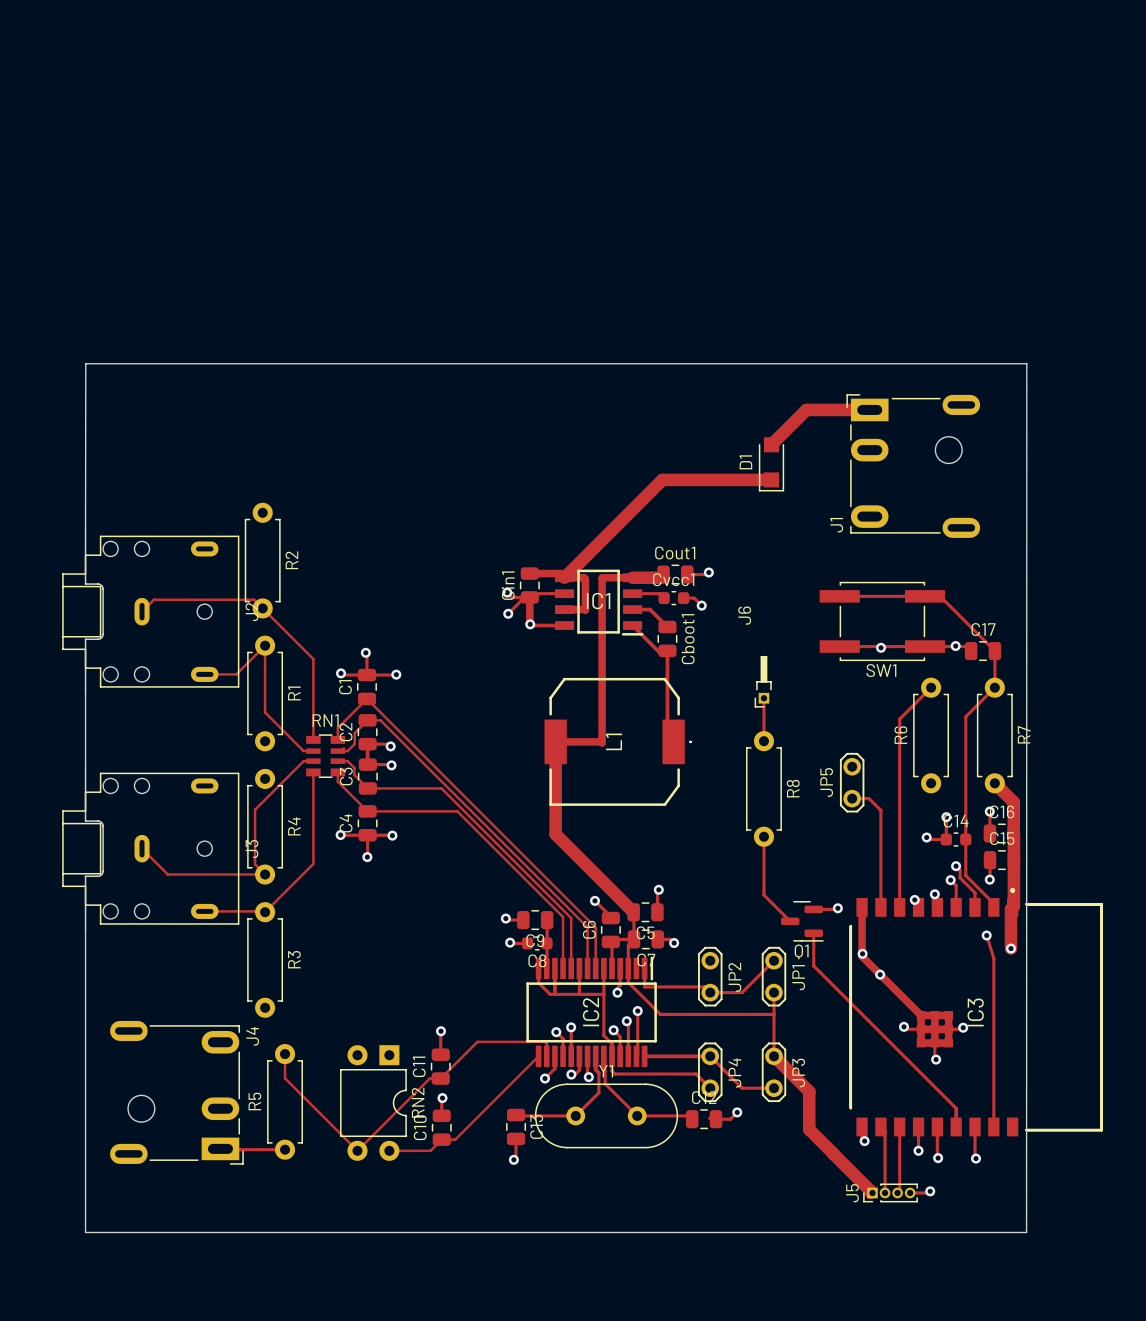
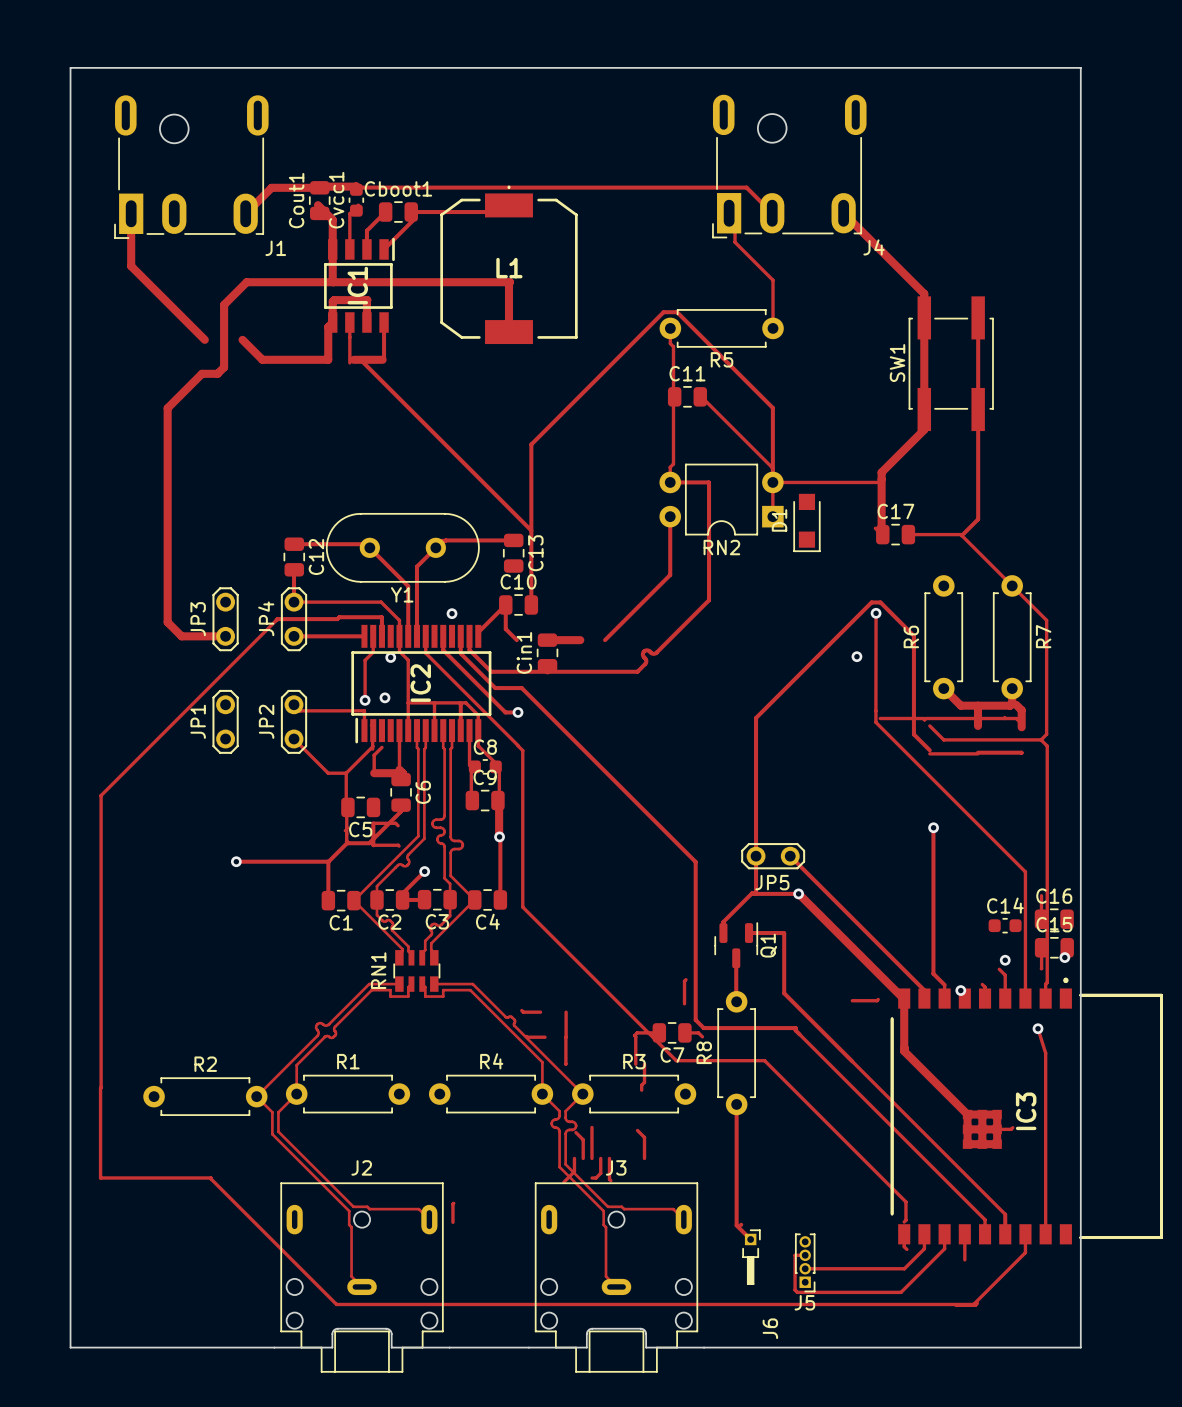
track: none -> (356, 186) (319, 186)
track: none -> (319, 187) (271, 187) (245, 213)
track: none -> (356, 189) (358, 187) (746, 187) (772, 213)
track: none -> (317, 205) (332, 219) (333, 282)
track: none -> (358, 205) (349, 213) (349, 249)
track: none -> (385, 212) (366, 230) (366, 249)
track: none -> (528, 212) (412, 212) (412, 221) (384, 249)
track: none -> (843, 213) (924, 293) (924, 429) (881, 472) (881, 534) (875, 528)
track: none -> (131, 213) (131, 266) (204, 339)
track: none -> (735, 225) (735, 242) (773, 280) (773, 328)
track: none -> (978, 317) (978, 519) (961, 535)
track: none -> (349, 322) (349, 362)
track: none -> (366, 322) (367, 300) (334, 300) (332, 322) (328, 326) (328, 359) (262, 359) (242, 339)
track: none -> (384, 322) (384, 358) (353, 359) (360, 359) (531, 530)
track: none -> (508, 324) (509, 282) (246, 282) (224, 304) (224, 367) (217, 373) (202, 373) (167, 408) (167, 622) (181, 636) (225, 636)
track: none -> (670, 328) (670, 343) (673, 346) (673, 464) (670, 467) (670, 482) (709, 482) (709, 600) (656, 652) (652, 653) (647, 650) (644, 651) (642, 655) (646, 662) (637, 671) (491, 671) (469, 650) (469, 636)
track: none -> (701, 396) (772, 467) (772, 516)
track: (869, 409) (806, 409) (771, 444) -> none
track: none -> (881, 479) (878, 482) (772, 482) (772, 407) (677, 312) (663, 312) (531, 444) (531, 604)
track: none -> (670, 516) (670, 574) (605, 640)
J1 rotation: 0° (913, 466) -> 90° counterclockwise (191, 167)
J1 position: (913, 466) -> (191, 167)
track: none -> (909, 534) (960, 534) (1046, 620) (1046, 734) (1041, 739)
track: (771, 479) (662, 479) (564, 577) -> none
track: none -> (513, 540) (442, 540) (416, 566) (416, 636)
track: none -> (294, 544) (366, 544) (408, 586) (408, 636)
track: none -> (294, 569) (294, 602) (381, 602) (399, 620) (399, 651) (408, 660) (408, 730)
J1 name position: J1 (836, 525) -> J1 (275, 248)
board edge: (85, 530) (85, 363) (1026, 363) (1026, 1232) -> (70, 768) (70, 67) (1080, 67) (1080, 1347)
via: none -> (452, 613)
track: none -> (876, 613) (875, 710)
via: none -> (876, 613)
Cout1 name position: Cout1 (675, 552) -> Cout1 (296, 200)
R2 rotation: 0° (262, 560) -> 90° clockwise (205, 1096)
R2 position: (262, 560) -> (205, 1096)
R2 name position: R2 (291, 560) -> R2 (205, 1064)
track: none -> (294, 636) (364, 636)
track: none -> (373, 636) (373, 652) (365, 660) (365, 700)
track: none -> (381, 636) (381, 617) (277, 619) (100, 795)
track: none -> (425, 636) (425, 653) (518, 745)
track: none -> (443, 636) (443, 650) (505, 712) (518, 712)
track: none -> (478, 636) (478, 632) (505, 604) (505, 629) (516, 640)
track: (708, 572) (706, 574) (687, 574) -> none
via: (708, 572) -> none
track: (663, 574) (660, 577) (602, 578) (602, 742) (562, 741) -> none
Cout1 rotation: 0° (675, 574) -> 90° clockwise (319, 200)
Cout1 position: (675, 574) -> (319, 200)
track: (564, 577) (585, 579) (585, 609) (564, 609) -> none
Cvcc1 name position: Cvcc1 (673, 579) -> Cvcc1 (336, 200)
via: none -> (856, 656)
via: none -> (390, 657)
track: (507, 592) (512, 597) (529, 597) (529, 624) -> none
via: (507, 592) -> none
track: (526, 593) (564, 593) -> none
track: (632, 593) (659, 593) (664, 598) -> none
track: (839, 596) (940, 596) (994, 651) (994, 687) (965, 716) (965, 875) (993, 903) -> (1041, 739) (1047, 746) (1047, 982) (1045, 994)
track: (524, 597) (508, 613) -> none
Cvcc1 rotation: 0° (673, 598) -> 90° clockwise (356, 200)
Cvcc1 position: (673, 598) -> (356, 200)
track: (683, 598) (694, 598) (701, 605) -> none
IC1 rotation: 0° (599, 602) -> 90° counterclockwise (359, 285)
IC1 position: (599, 602) -> (359, 285)
via: (701, 605) -> none
track: (632, 609) (650, 609) (667, 627) -> none
track: (142, 611) (153, 599) (254, 599) (313, 659) (313, 739) -> none
J2 rotation: 0° (150, 611) -> 90° counterclockwise (362, 1277)
J2 position: (150, 611) -> (362, 1277)
via: (508, 613) -> none
track: none -> (943, 688) (960, 705) (1010, 705) (1012, 703) (1012, 688)
SW1 rotation: 0° (882, 621) -> 90° clockwise (951, 363)
SW1 position: (882, 621) -> (951, 363)
track: (530, 624) (564, 625) -> none
via: (530, 624) -> none
track: (632, 625) (659, 651) (667, 651) (667, 760) -> none
via: none -> (384, 697)
via: none -> (365, 700)
track: none -> (408, 702) (465, 702) (478, 715) (478, 746) (499, 766) (499, 807)
track: none -> (459, 702) (460, 730)
track: none -> (434, 703) (434, 730)
track: none -> (294, 704) (300, 710) (364, 710) (364, 730)
track: none -> (1016, 704) (1021, 710) (1021, 727)
track: none -> (978, 705) (978, 725)
Cboot1 rotation: 0° (667, 638) -> 90° clockwise (398, 212)
Cboot1 position: (667, 638) -> (398, 212)
Cboot1 name position: Cboot1 (688, 639) -> Cboot1 (398, 188)
via: none -> (518, 712)
via: (955, 646) -> none
via: (881, 647) -> none
C17 position: (983, 651) -> (895, 534)
via: (365, 652) -> none
track: none -> (929, 725) (943, 739) (1041, 739)
track: none -> (399, 730) (399, 769) (402, 773) (374, 773) (374, 755) (381, 747)
track: none -> (416, 730) (418, 836) (353, 900) (402, 949) (399, 957)
track: none -> (425, 730) (424, 838) (407, 855) (409, 861) (407, 865) (398, 864) (376, 886) (376, 915) (383, 921) (389, 920) (392, 922) (391, 929) (408, 946) (411, 957)
track: none -> (443, 730) (444, 816) (442, 819) (434, 820) (432, 823) (434, 827) (442, 828) (444, 831) (443, 834) (438, 836) (437, 840) (444, 846) (444, 878) (450, 883) (450, 916) (440, 925) (434, 923) (430, 926) (431, 933) (425, 940) (425, 950) (422, 953) (422, 957)
track: none -> (452, 730) (450, 837) (453, 840) (460, 841) (462, 845) (460, 848) (450, 851) (450, 875) (474, 899) (431, 943) (434, 957)
track: none -> (469, 730) (471, 807)
track: none -> (294, 738) (328, 773) (346, 773)
track: none -> (517, 745) (522, 750) (522, 907) (676, 1060) (764, 1060) (905, 1201) (905, 1220) (904, 1222)
track: none -> (372, 746) (346, 773)
track: (341, 673) (342, 675) (396, 674) -> none
via: (341, 673) -> none
track: (204, 674) (236, 674) (265, 645) (265, 712) (303, 751) (313, 751) -> none
via: (396, 674) -> none
track: none -> (929, 750) (913, 734) (913, 635) (880, 602) (871, 602) (756, 718) (756, 893)
track: none -> (978, 752) (1021, 752)
track: none -> (929, 753) (978, 753)
J6 rotation: 0° (763, 681) -> 180° (751, 1257)
J6 position: (763, 681) -> (751, 1257)
C1 rotation: 0° (366, 686) -> 90° clockwise (341, 900)
C1 position: (366, 686) -> (341, 900)
C1 name position: C1 (345, 687) -> C1 (341, 922)
track: (931, 687) (899, 719) (899, 894) -> (933, 827) (933, 973) (944, 984)
R1 rotation: 0° (265, 693) -> 90° clockwise (348, 1094)
R1 position: (265, 693) -> (348, 1094)
R1 name position: R1 (294, 693) -> R1 (348, 1061)
track: none -> (346, 773) (346, 843) (328, 861)
track: (763, 698) (763, 741) -> none
RN1 name position: RN1 (325, 720) -> RN1 (378, 970)
track: none -> (499, 800) (500, 899)
track: none -> (401, 806) (401, 811) (369, 843) (348, 843) (346, 841)
C2 name position: C2 (346, 732) -> C2 (389, 922)
C2 rotation: 0° (367, 732) -> 90° clockwise (389, 899)
C2 position: (367, 732) -> (389, 899)
R6 position: (931, 735) -> (943, 637)
R7 position: (994, 735) -> (1012, 637)
track: (555, 741) (555, 834) (633, 912) (633, 939) (628, 945) (628, 982) (660, 1014) (774, 1014) -> none
L1 rotation: 0° (618, 741) -> 90° counterclockwise (508, 264)
L1 position: (618, 741) -> (508, 264)
track: (343, 742) (337, 739) (337, 727) (366, 698) (595, 927) (595, 968) -> none
via: (390, 746) -> none
via: none -> (933, 827)
track: (337, 751) (347, 751) (354, 743) (354, 733) (367, 720) (380, 720) (587, 927) (587, 968) -> none
RN1 rotation: 0° (325, 756) -> 90° clockwise (416, 970)
RN1 position: (325, 756) -> (416, 970)
via: none -> (499, 836)
track: (313, 761) (303, 761) (255, 809) (255, 864) (265, 874) (167, 874) (142, 848) -> none
track: (337, 761) (347, 761) (354, 768) (354, 775) (367, 788) (441, 788) (571, 918) (571, 968) -> none
via: (391, 765) -> none
board edge: none -> (70, 847) (70, 1023)
track: (313, 772) (313, 863) (265, 912) (204, 911) -> none
track: (342, 772) (337, 772) (337, 781) (367, 811) (457, 811) (563, 917) (563, 968) -> none
track: none -> (790, 856) (924, 990)
C3 name position: C3 (346, 776) -> C3 (437, 921)
C3 rotation: 0° (367, 776) -> 90° clockwise (437, 899)
C3 position: (367, 776) -> (437, 899)
track: none -> (236, 861) (328, 861)
via: none -> (236, 861)
track: none -> (328, 861) (328, 900)
JP5 name position: JP5 (826, 782) -> JP5 (772, 882)
JP5 rotation: 0° (852, 782) -> 90° clockwise (773, 856)
JP5 position: (852, 782) -> (773, 856)
track: (994, 783) (1013, 802) (1013, 833) -> none
R8 position: (763, 788) -> (736, 1053)
R8 name position: R8 (793, 788) -> R8 (704, 1052)
track: none -> (424, 871) (402, 893) (402, 899) (424, 899)
via: none -> (424, 871)
track: (852, 798) (869, 798) (880, 810) (880, 907) -> none
via: none -> (798, 893)
track: none -> (798, 894) (752, 893) (723, 921) (723, 933)
track: none -> (798, 894) (903, 998)
via: (989, 811) -> none
track: (946, 817) (946, 839) (928, 839) (926, 837) -> none
via: (946, 817) -> none
C4 name position: C4 (346, 823) -> C4 (487, 921)
C4 rotation: 0° (367, 823) -> 90° clockwise (487, 899)
C4 position: (367, 823) -> (487, 899)
R4 rotation: 0° (265, 826) -> 90° clockwise (491, 1094)
R4 position: (265, 826) -> (491, 1094)
R4 name position: R4 (294, 826) -> R4 (491, 1061)
track: (1013, 833) (1013, 906) (1011, 909) (1011, 948) -> none
track: (340, 835) (392, 835) -> none
via: (340, 835) -> none
track: (367, 835) (367, 857) -> none
via: (392, 835) -> none
track: (763, 836) (763, 895) (790, 921) -> none
via: (926, 837) -> none
J3 rotation: 0° (150, 848) -> 90° counterclockwise (616, 1277)
J3 position: (150, 848) -> (616, 1277)
via: (367, 857) -> none
track: (956, 866) (960, 870) (960, 877) (975, 892) -> (875, 710) (875, 722) (1025, 871) (1025, 982)
via: (956, 866) -> none
track: none -> (736, 958) (736, 1001)
via: none -> (1064, 957)
via: none -> (1005, 960)
via: (989, 879) -> none
via: (950, 880) -> none
via: (658, 889) -> none
track: none -> (399, 984) (369, 984) (328, 1024) (323, 1024)
track: none -> (411, 984) (408, 987) (408, 996) (390, 996) (390, 990) (371, 990) (334, 1027) (335, 1033) (333, 1036) (325, 1036) (296, 1065) (296, 1094) (278, 1112) (278, 1131) (353, 1206) (367, 1206) (369, 1209) (418, 1209) (429, 1219)
track: none -> (422, 984) (425, 987) (425, 996) (443, 996) (443, 990) (470, 990) (542, 1062) (542, 1094) (559, 1111) (559, 1117) (551, 1123)
track: none -> (434, 984) (472, 984) (505, 1017) (508, 1017)
via: (934, 894) -> none
track: (594, 900) (610, 918) -> none
via: (594, 900) -> none
via: (837, 908) -> none
C5 position: (645, 912) -> (360, 807)
via: (505, 918) -> none
C9 position: (535, 920) -> (485, 800)
Q1 rotation: 0° (802, 921) -> 90° counterclockwise (736, 945)
Q1 position: (802, 921) -> (736, 945)
C6 name position: C6 (589, 929) -> C6 (423, 792)
C6 position: (610, 929) -> (401, 792)
track: none -> (323, 1024) (317, 1024) (317, 1030)
track: (813, 933) (813, 965) -> (749, 933) (784, 933) (784, 993) (852, 1061)
track: none -> (317, 1030) (317, 1035) (256, 1096) (272, 1112) (272, 1134) (349, 1211) (349, 1224) (351, 1227) (351, 1276) (362, 1286)
C9 name position: C9 (535, 940) -> C9 (485, 777)
via: (510, 942) -> none
C8 position: (537, 943) -> (485, 766)
via: (674, 943) -> none
via: (1011, 948) -> none
via: (862, 953) -> none
R3 rotation: 0° (265, 959) -> 90° clockwise (634, 1094)
R3 position: (265, 959) -> (634, 1094)
R3 name position: R3 (294, 959) -> R3 (634, 1061)
C8 name position: C8 (537, 960) -> C8 (485, 747)
track: (774, 960) (742, 992) (710, 992) (704, 986) (644, 986) (644, 968) -> none
track: (538, 968) (538, 982) (550, 994) (603, 994) -> none
track: (554, 968) (555, 994) -> none
track: (579, 968) (579, 994) -> none
track: (603, 968) (603, 1035) (612, 1043) (612, 1071) (614, 1074) (696, 1074) (710, 1088) -> none
via: (880, 974) -> none
JP2 position: (710, 976) -> (294, 721)
JP1 position: (774, 976) -> (225, 721)
JP2 name position: JP2 (734, 977) -> JP2 (266, 721)
JP1 name position: JP1 (798, 977) -> JP1 (198, 721)
via: (617, 992) -> none
track: (774, 992) (774, 1056) (809, 1091) (809, 1129) (833, 1153) -> none
track: none -> (736, 1104) (736, 1225) (750, 1239)
IC2 rotation: 0° (591, 1011) -> 180° (421, 684)
IC2 position: (591, 1011) -> (421, 684)
track: (637, 1011) (636, 1056) -> none
via: (637, 1011) -> none
track: (626, 1021) (629, 1055) -> none
via: (626, 1021) -> none
track: none -> (551, 1123) (559, 1131) (559, 1166) (603, 1211) (603, 1224) (606, 1227) (606, 1276) (616, 1286)
track: (903, 1026) (906, 1029) (921, 1029) -> none
via: (903, 1026) -> none
via: (571, 1027) -> none
via: (963, 1027) -> none
via: (613, 1030) -> none
track: (441, 1031) (440, 1054) -> none
via: (441, 1031) -> none
via: (556, 1032) -> none
J4 name position: J4 (252, 1036) -> J4 (874, 247)
track: (546, 1043) (545, 1041) (477, 1041) (440, 1078) (429, 1078) (357, 1150) (285, 1078) (285, 1054) -> (565, 1144) (566, 1131) (574, 1129) (576, 1125) (574, 1122) (566, 1120) (565, 1111) (582, 1094) (514, 1025) (514, 1019) (508, 1017)
track: (934, 1043) (936, 1059) -> none
track: none -> (565, 1158) (565, 1164) (607, 1206) (621, 1206) (624, 1209) (673, 1209) (683, 1219)
track: (595, 1056) (595, 1069) (598, 1072) (598, 1092) (575, 1115) (516, 1115) -> none
track: (603, 1056) (605, 1083) (637, 1115) (688, 1115) (692, 1119) -> none
track: (644, 1056) (710, 1056) (742, 1088) (774, 1088) -> none
track: (538, 1059) (538, 1056) (455, 1139) (441, 1139) (430, 1150) (389, 1150) -> none
via: (936, 1059) -> none
C11 rotation: 0° (440, 1066) -> 90° clockwise (687, 396)
C11 position: (440, 1066) -> (687, 396)
Y1 name position: Y1 (605, 1071) -> Y1 (402, 594)
JP4 position: (710, 1072) -> (294, 619)
JP4 name position: JP4 (734, 1072) -> JP4 (266, 618)
JP3 position: (774, 1072) -> (225, 619)
JP3 name position: JP3 (798, 1072) -> JP3 (198, 619)
via: (571, 1074) -> none
via: (588, 1077) -> none
via: (545, 1078) -> none
J4 rotation: 0° (176, 1092) -> 90° clockwise (789, 166)
J4 position: (176, 1092) -> (789, 166)
via: (442, 1098) -> none
R5 name position: R5 (254, 1101) -> R5 (722, 359)
R5 rotation: 0° (285, 1101) -> 90° clockwise (721, 328)
R5 position: (285, 1101) -> (721, 328)
RN2 rotation: 0° (373, 1103) -> 90° clockwise (721, 499)
RN2 position: (373, 1103) -> (721, 499)
track: (737, 1112) (730, 1119) (716, 1119) -> none
via: (737, 1112) -> none
Y1 position: (606, 1115) -> (402, 547)
C12 rotation: 0° (704, 1119) -> 90° clockwise (294, 557)
C12 position: (704, 1119) -> (294, 557)
C13 position: (516, 1126) -> (513, 553)
track: (880, 1126) (885, 1131) (885, 1192) -> (924, 1234) (924, 1248) (904, 1268) (805, 1268)
track: (937, 1126) (938, 1158) -> (985, 1234) (985, 1219) (795, 1030) (795, 1028) (703, 1028) (695, 1019) (695, 861) (521, 688) (495, 688) (460, 653) (460, 636)
C10 rotation: 0° (441, 1127) -> 90° clockwise (518, 604)
C10 position: (441, 1127) -> (518, 604)
track: (516, 1138) (516, 1157) (513, 1159) -> none
track: (899, 1140) (899, 1190) (897, 1192) -> (944, 1248) (901, 1292) (797, 1292) (795, 1290) (795, 1255) (805, 1255)
via: (864, 1141) -> none
track: (975, 1144) (976, 1158) -> (1025, 1252) (973, 1304) (336, 1304) (210, 1177) (100, 1177) (101, 795)
track: (220, 1148) (285, 1149) -> none
via: (918, 1150) -> none
track: (833, 1153) (870, 1192) -> none
via: (938, 1158) -> none
via: (976, 1158) -> none
via: (513, 1159) -> none
via: (930, 1191) -> none
J5 rotation: 0° (890, 1192) -> 90° counterclockwise (805, 1262)
J5 position: (890, 1192) -> (805, 1262)
board edge: (275, 1232) (438, 1232) -> none
board edge: (512, 1232) (675, 1232) -> none

